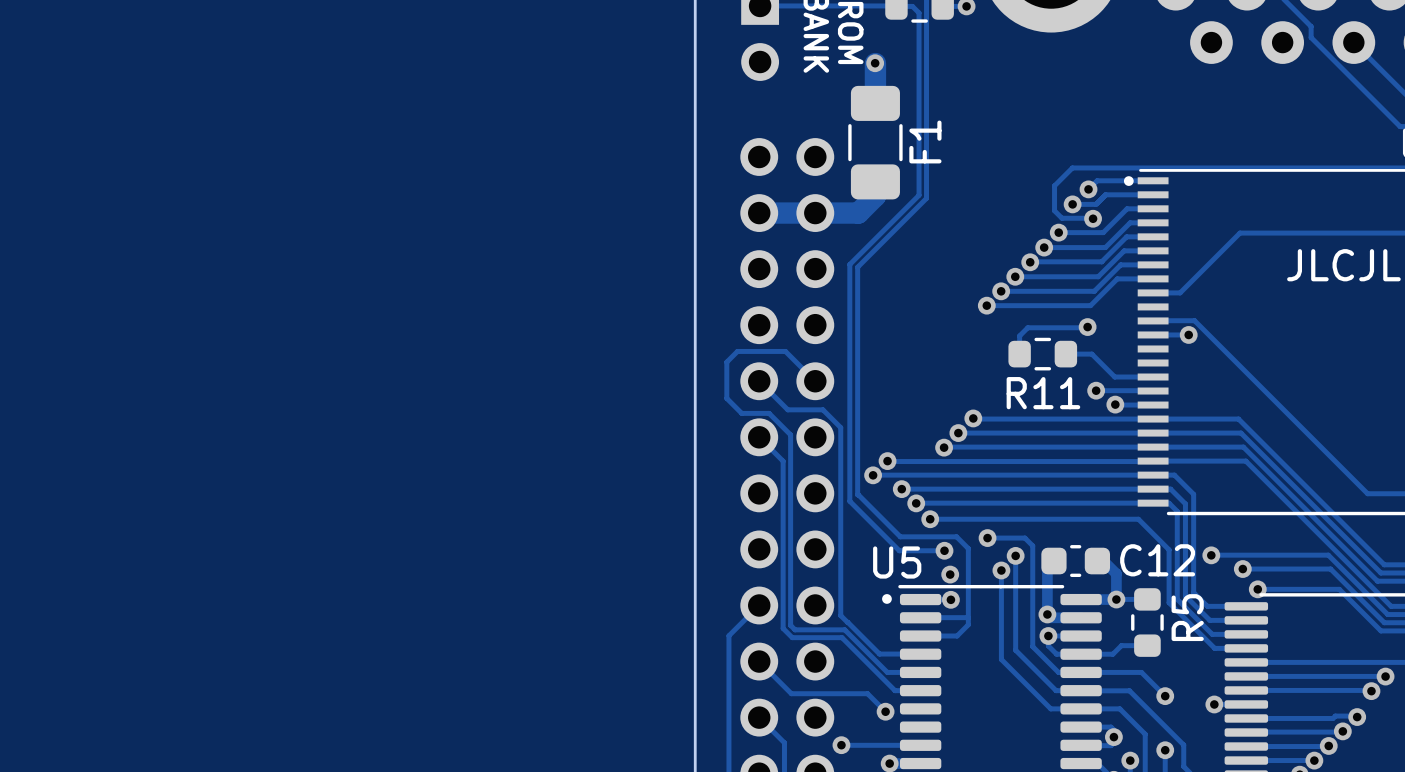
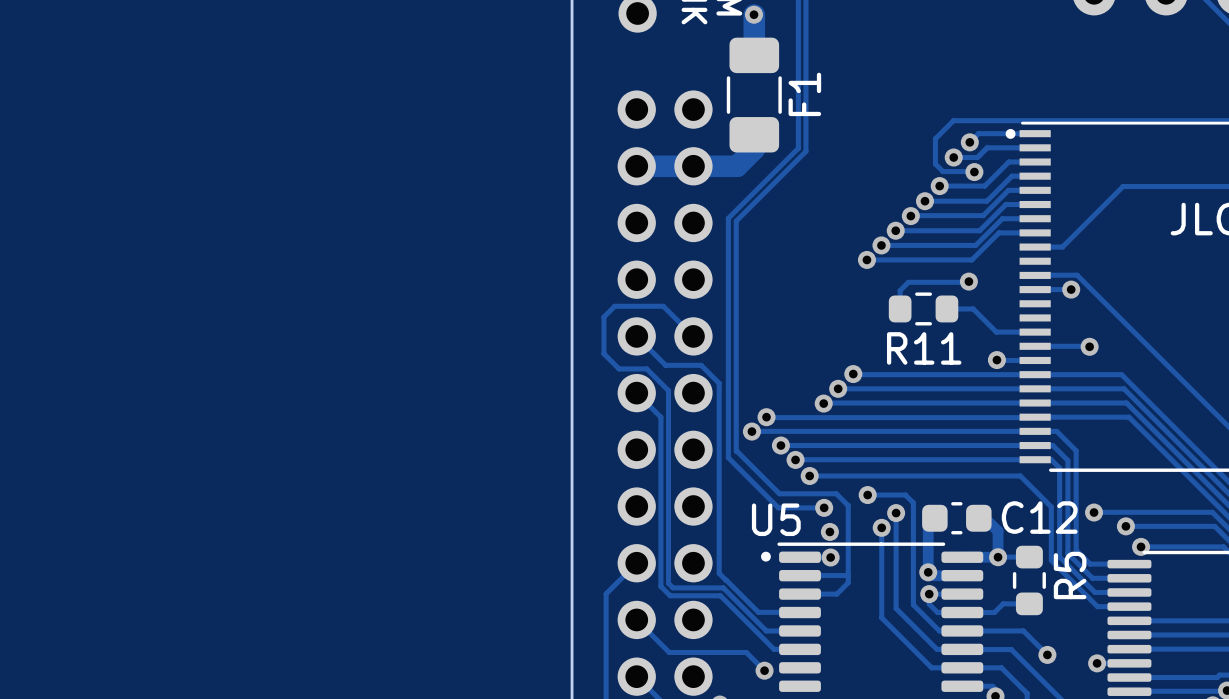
track: (1096, 390) (1152, 390) -> (1089, 346) (1035, 346)
via position: (1096, 390) -> (1089, 346)

